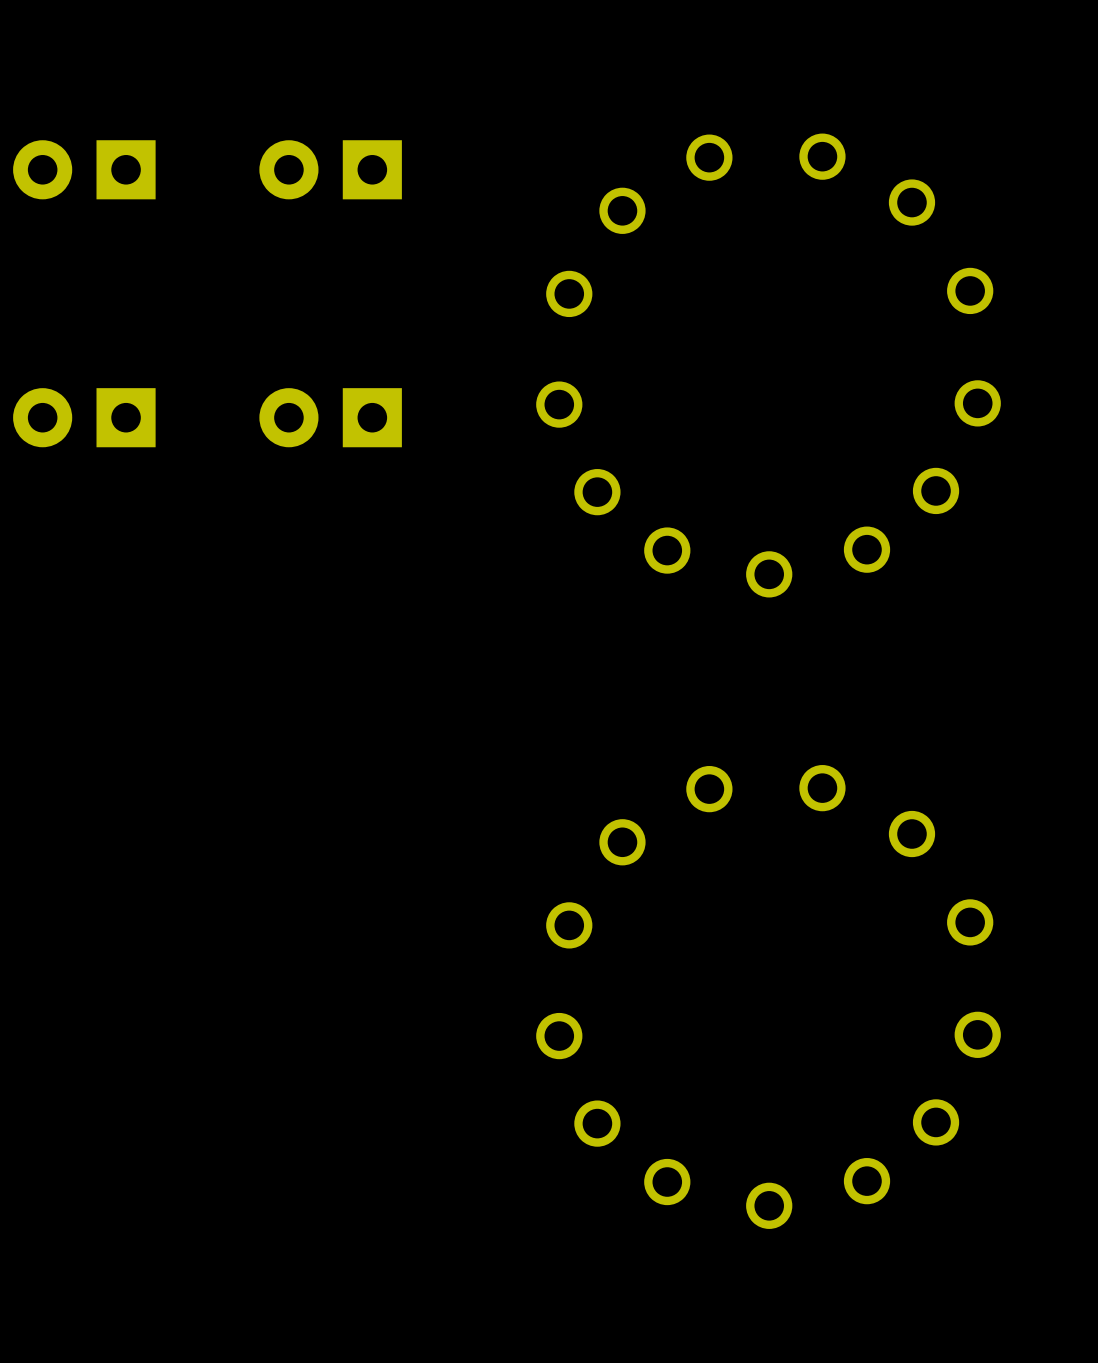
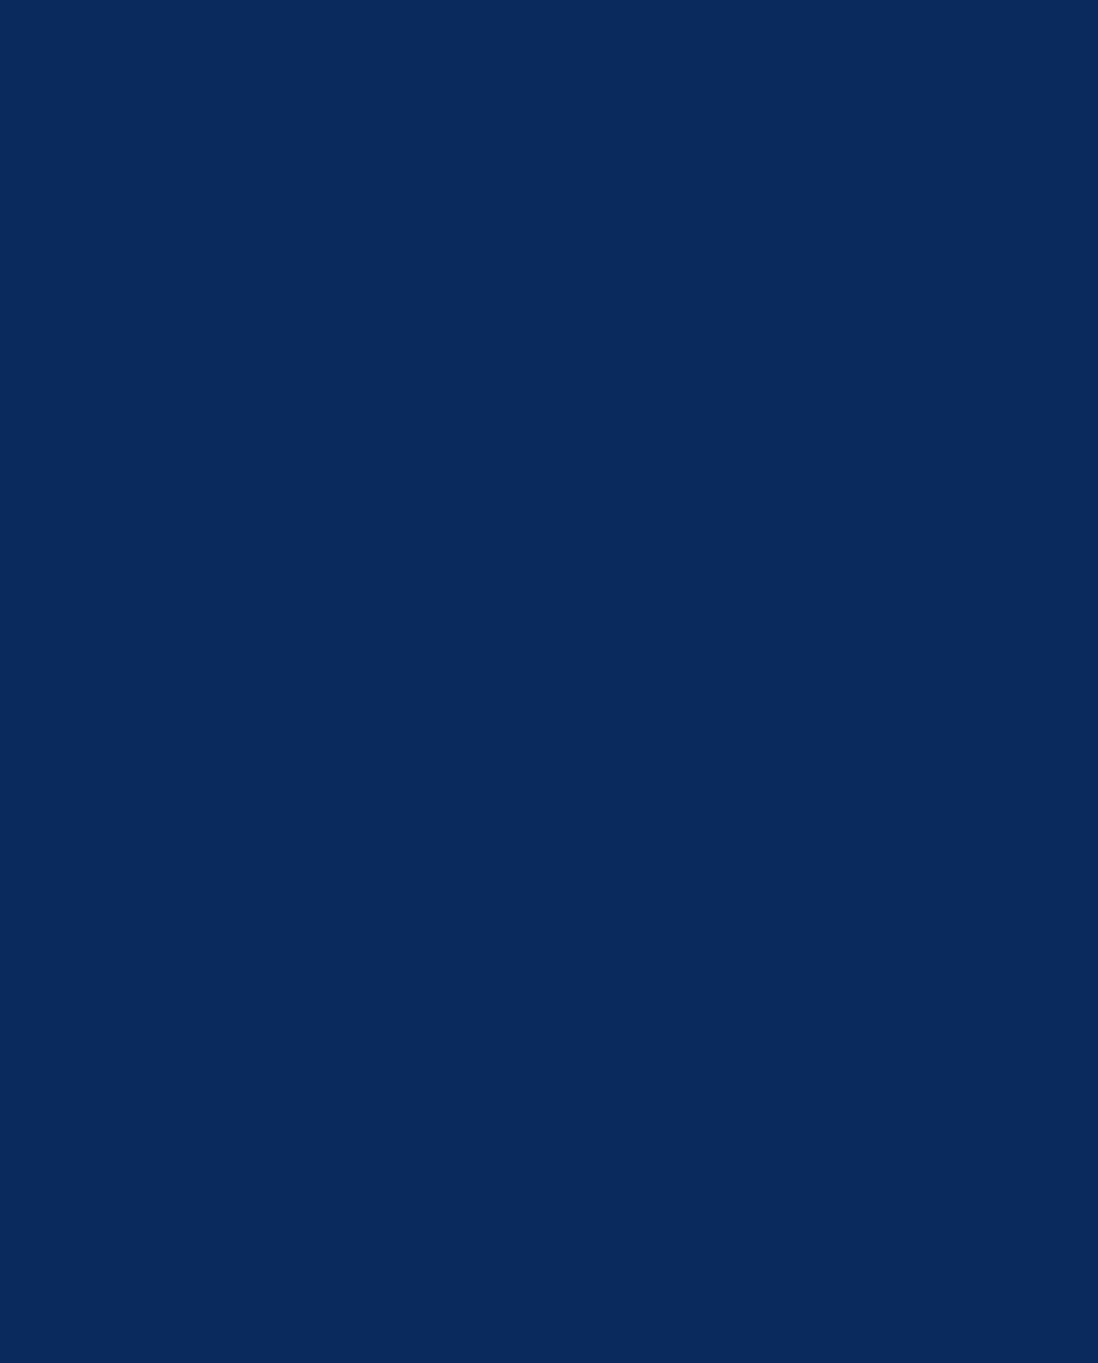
part: (84, 169) -> none
part: (330, 169) -> none
part: (768, 365) -> none
part: (84, 417) -> none
part: (330, 417) -> none
part: (768, 996) -> none

